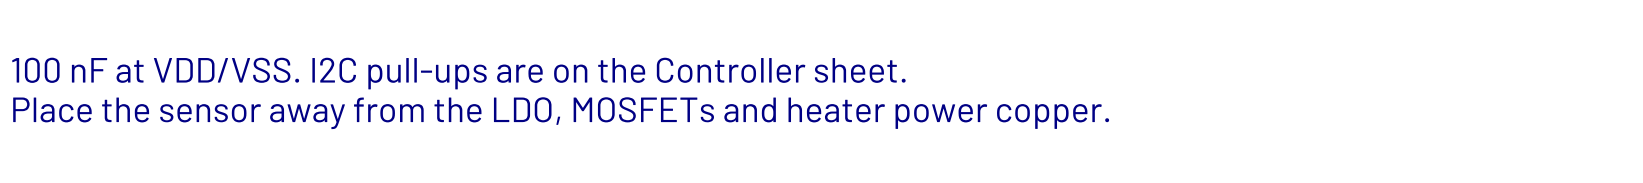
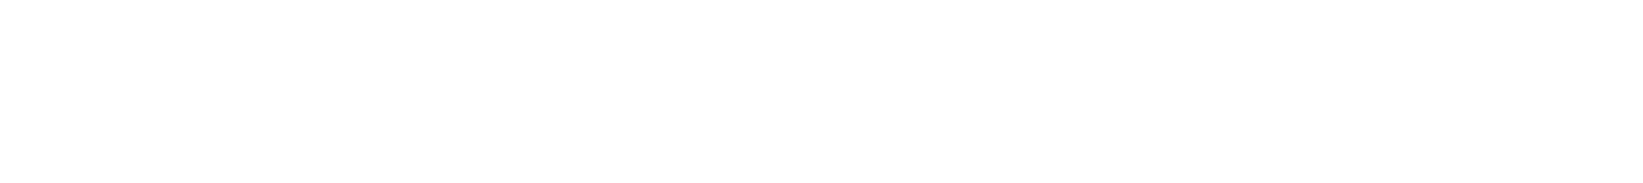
text: 100 nF at VDD/VSS. I2C pull-ups are on the Controller sheet. (458, 73) -> none
text: Place the sensor away from the LDO, MOSFETs and heater power copper. (561, 113) -> none

